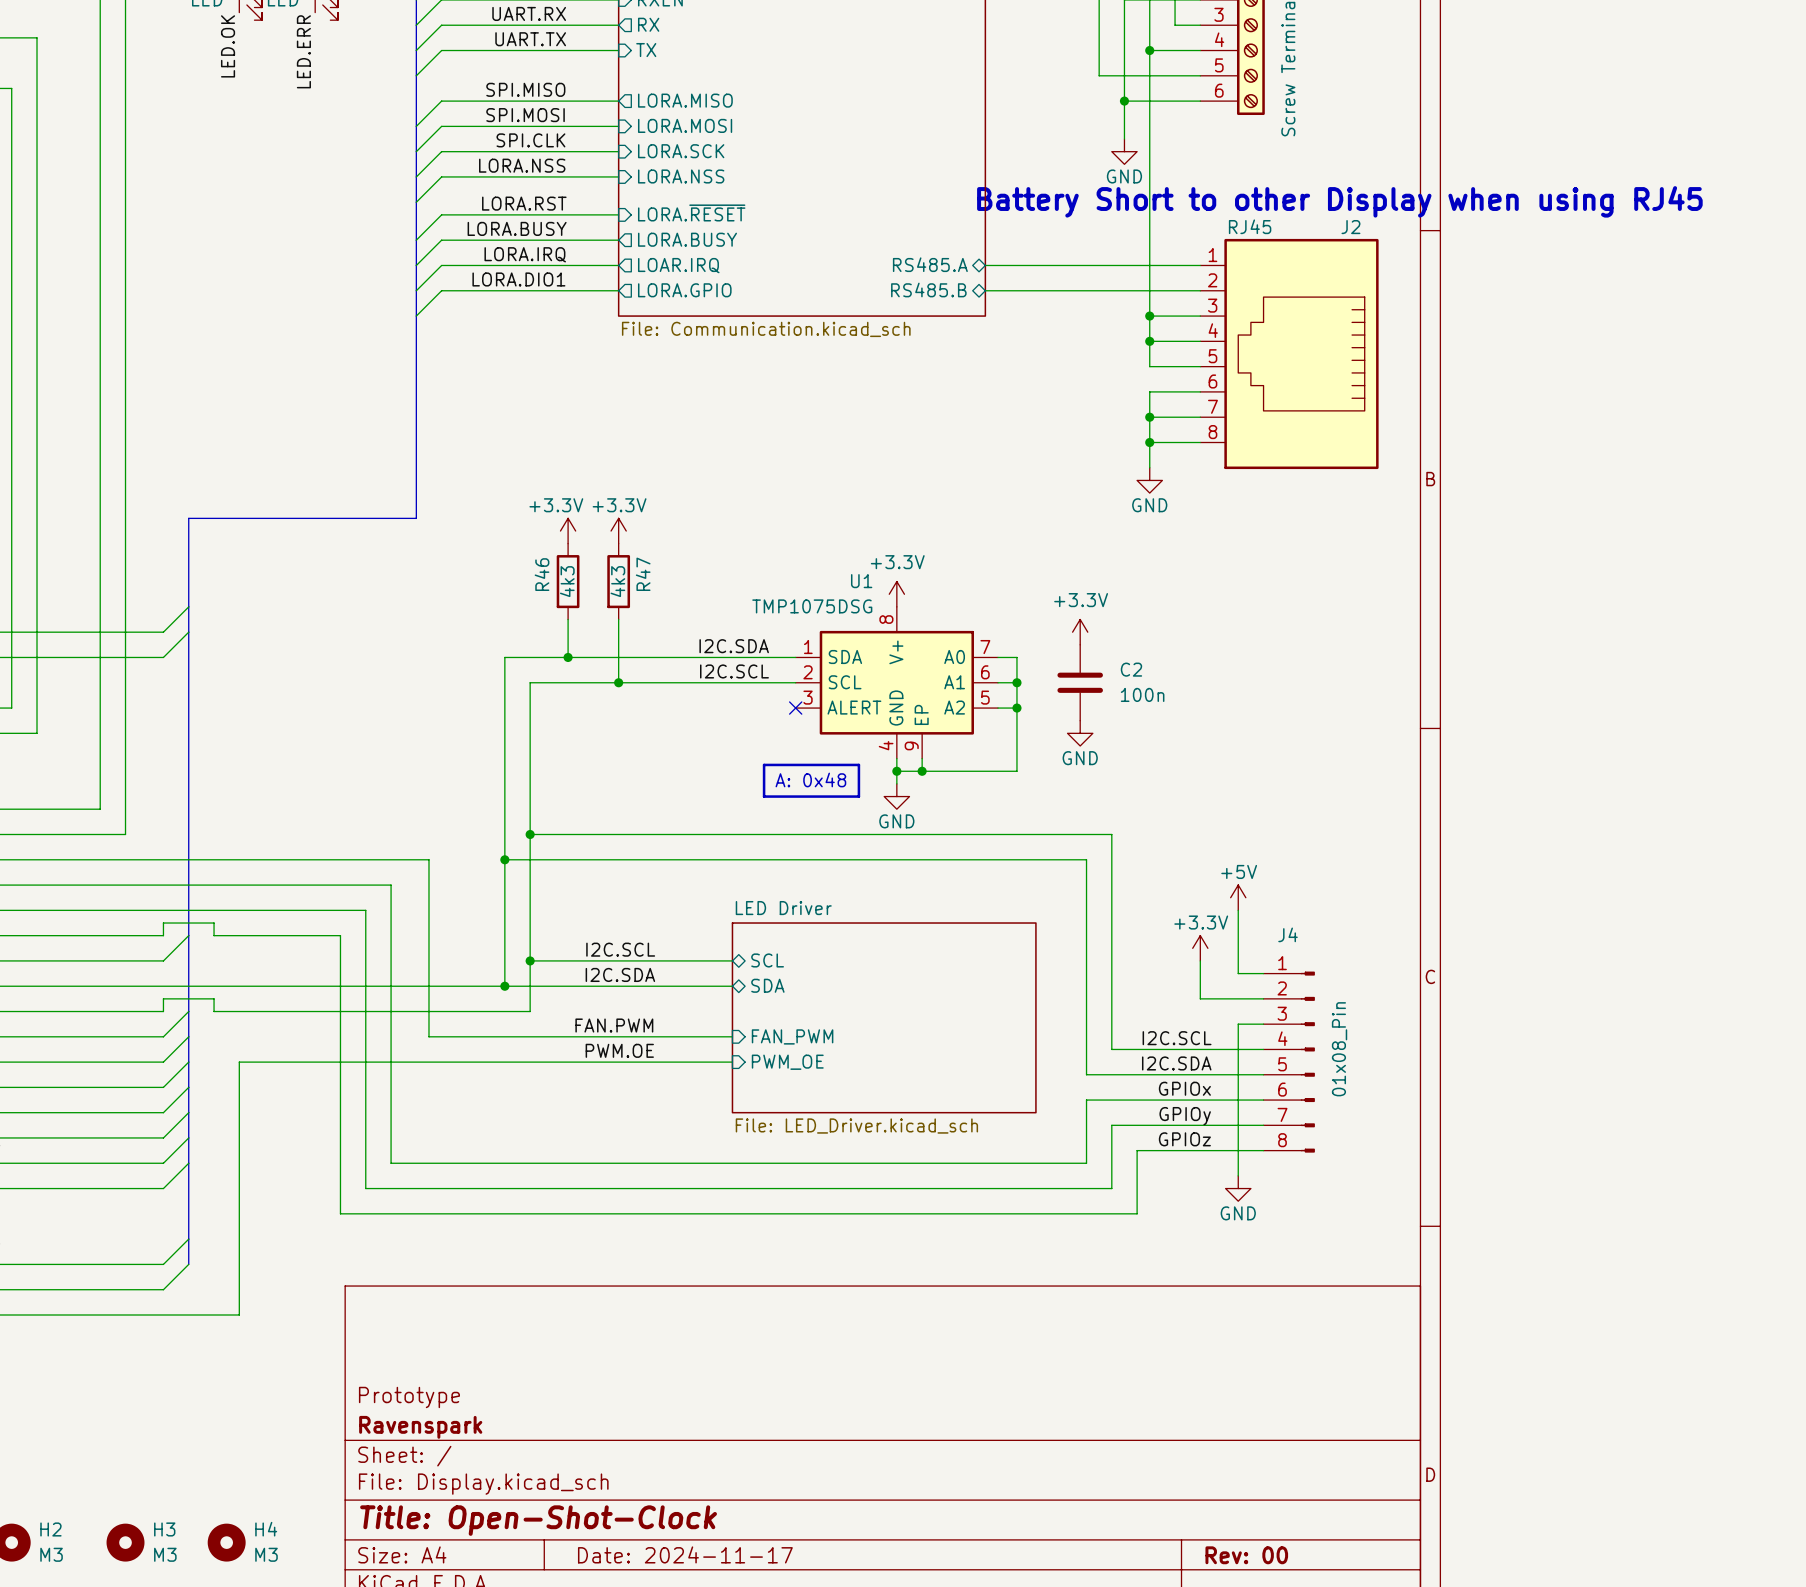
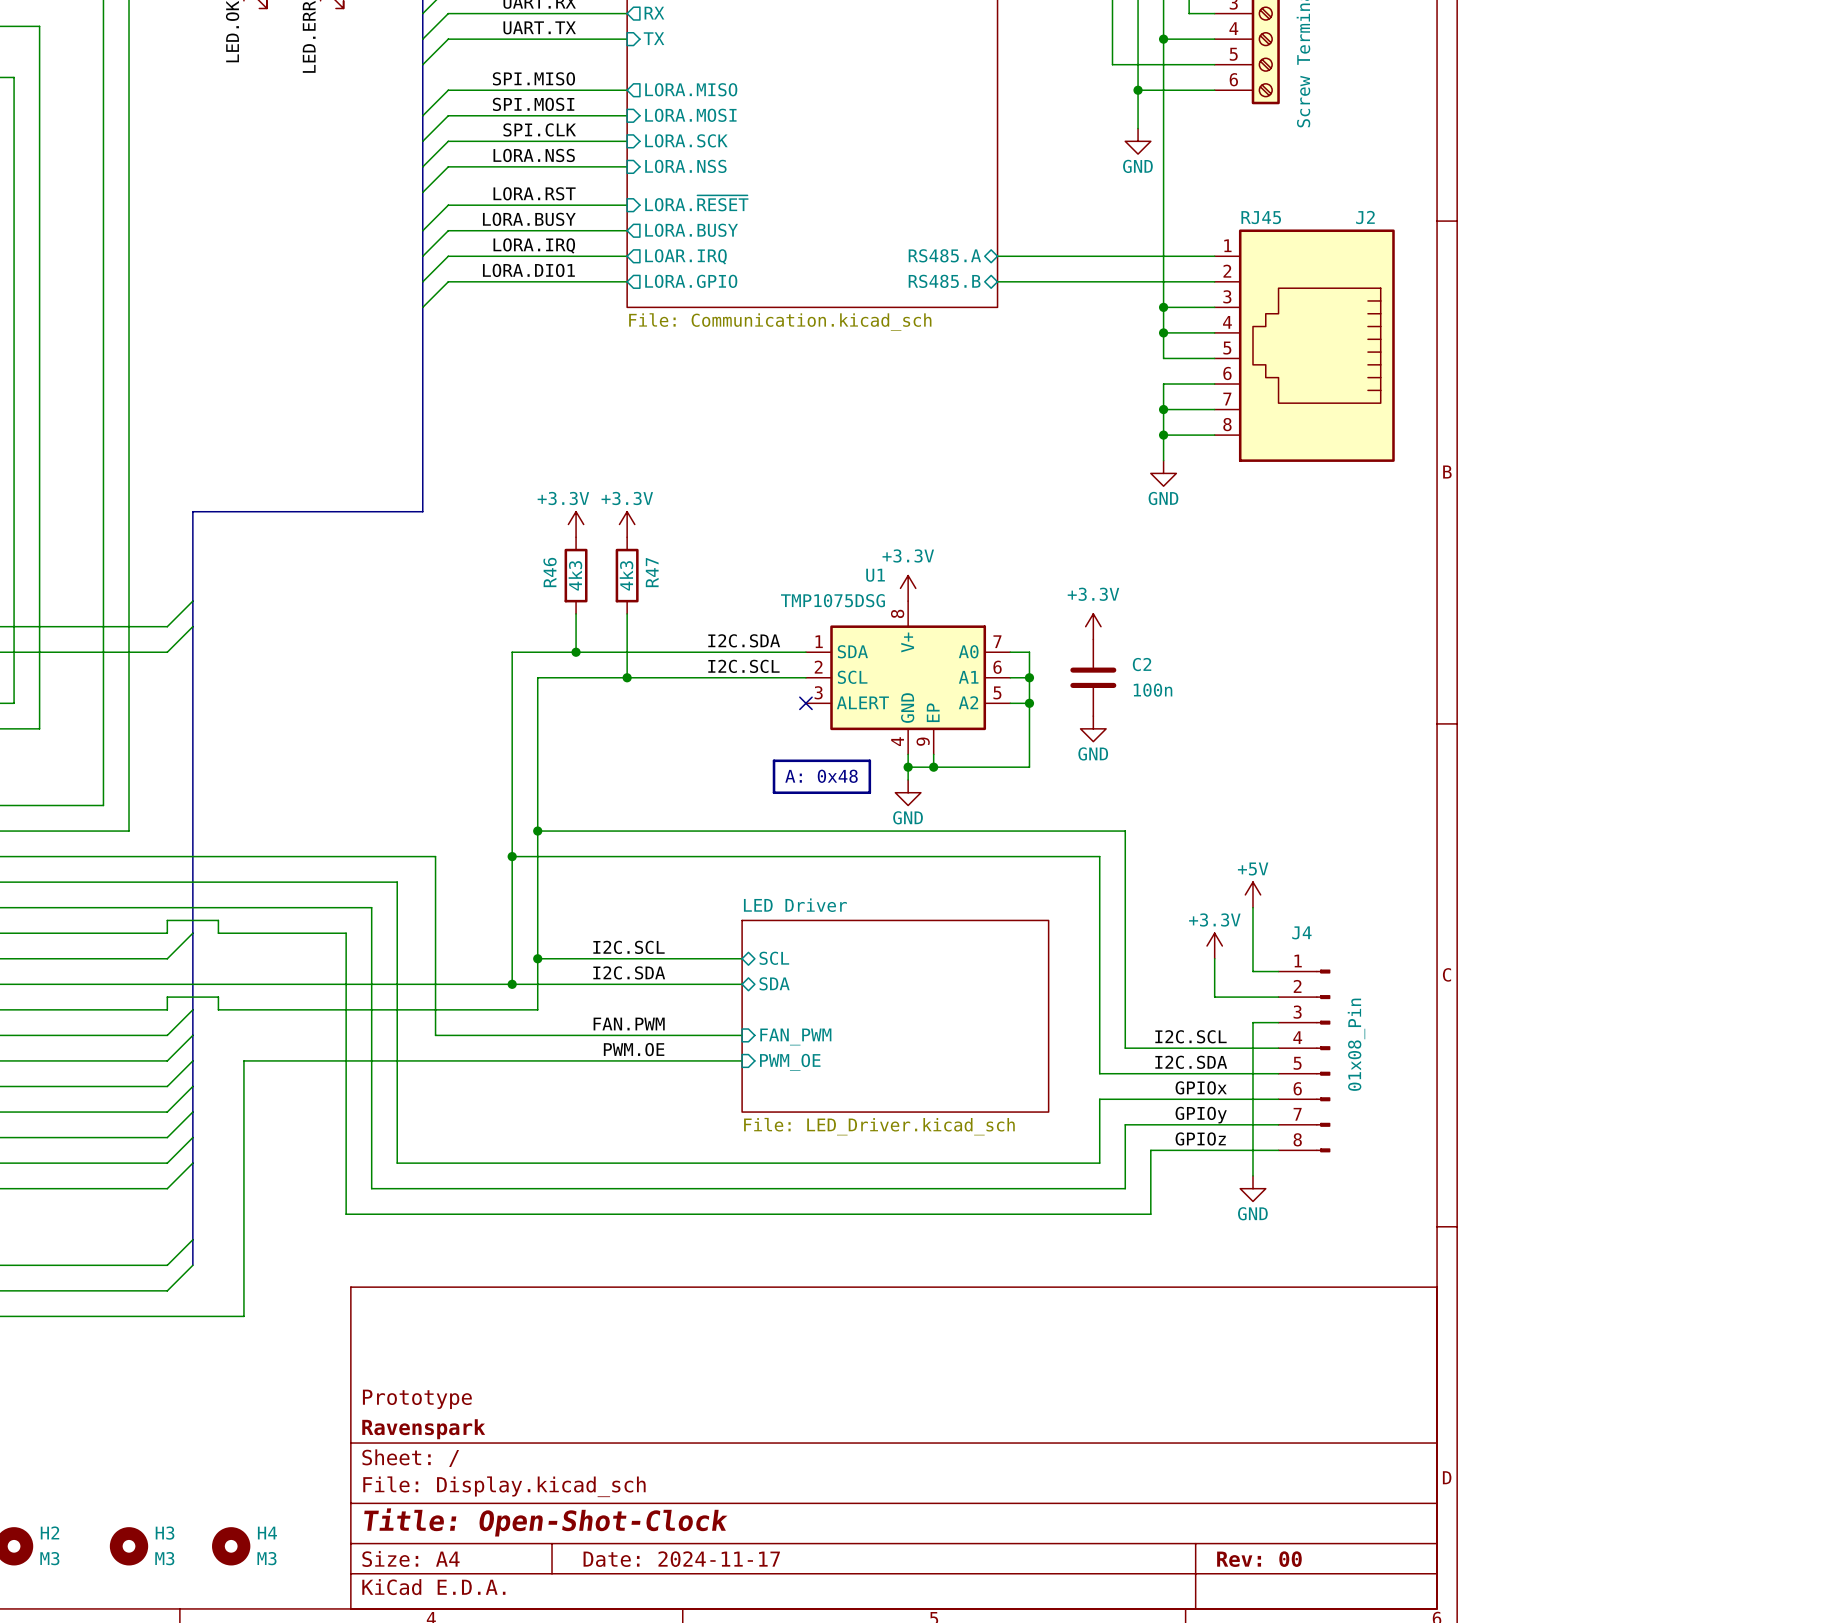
text: Battery Short to other Display when using RJ45 (1339, 201) -> none

